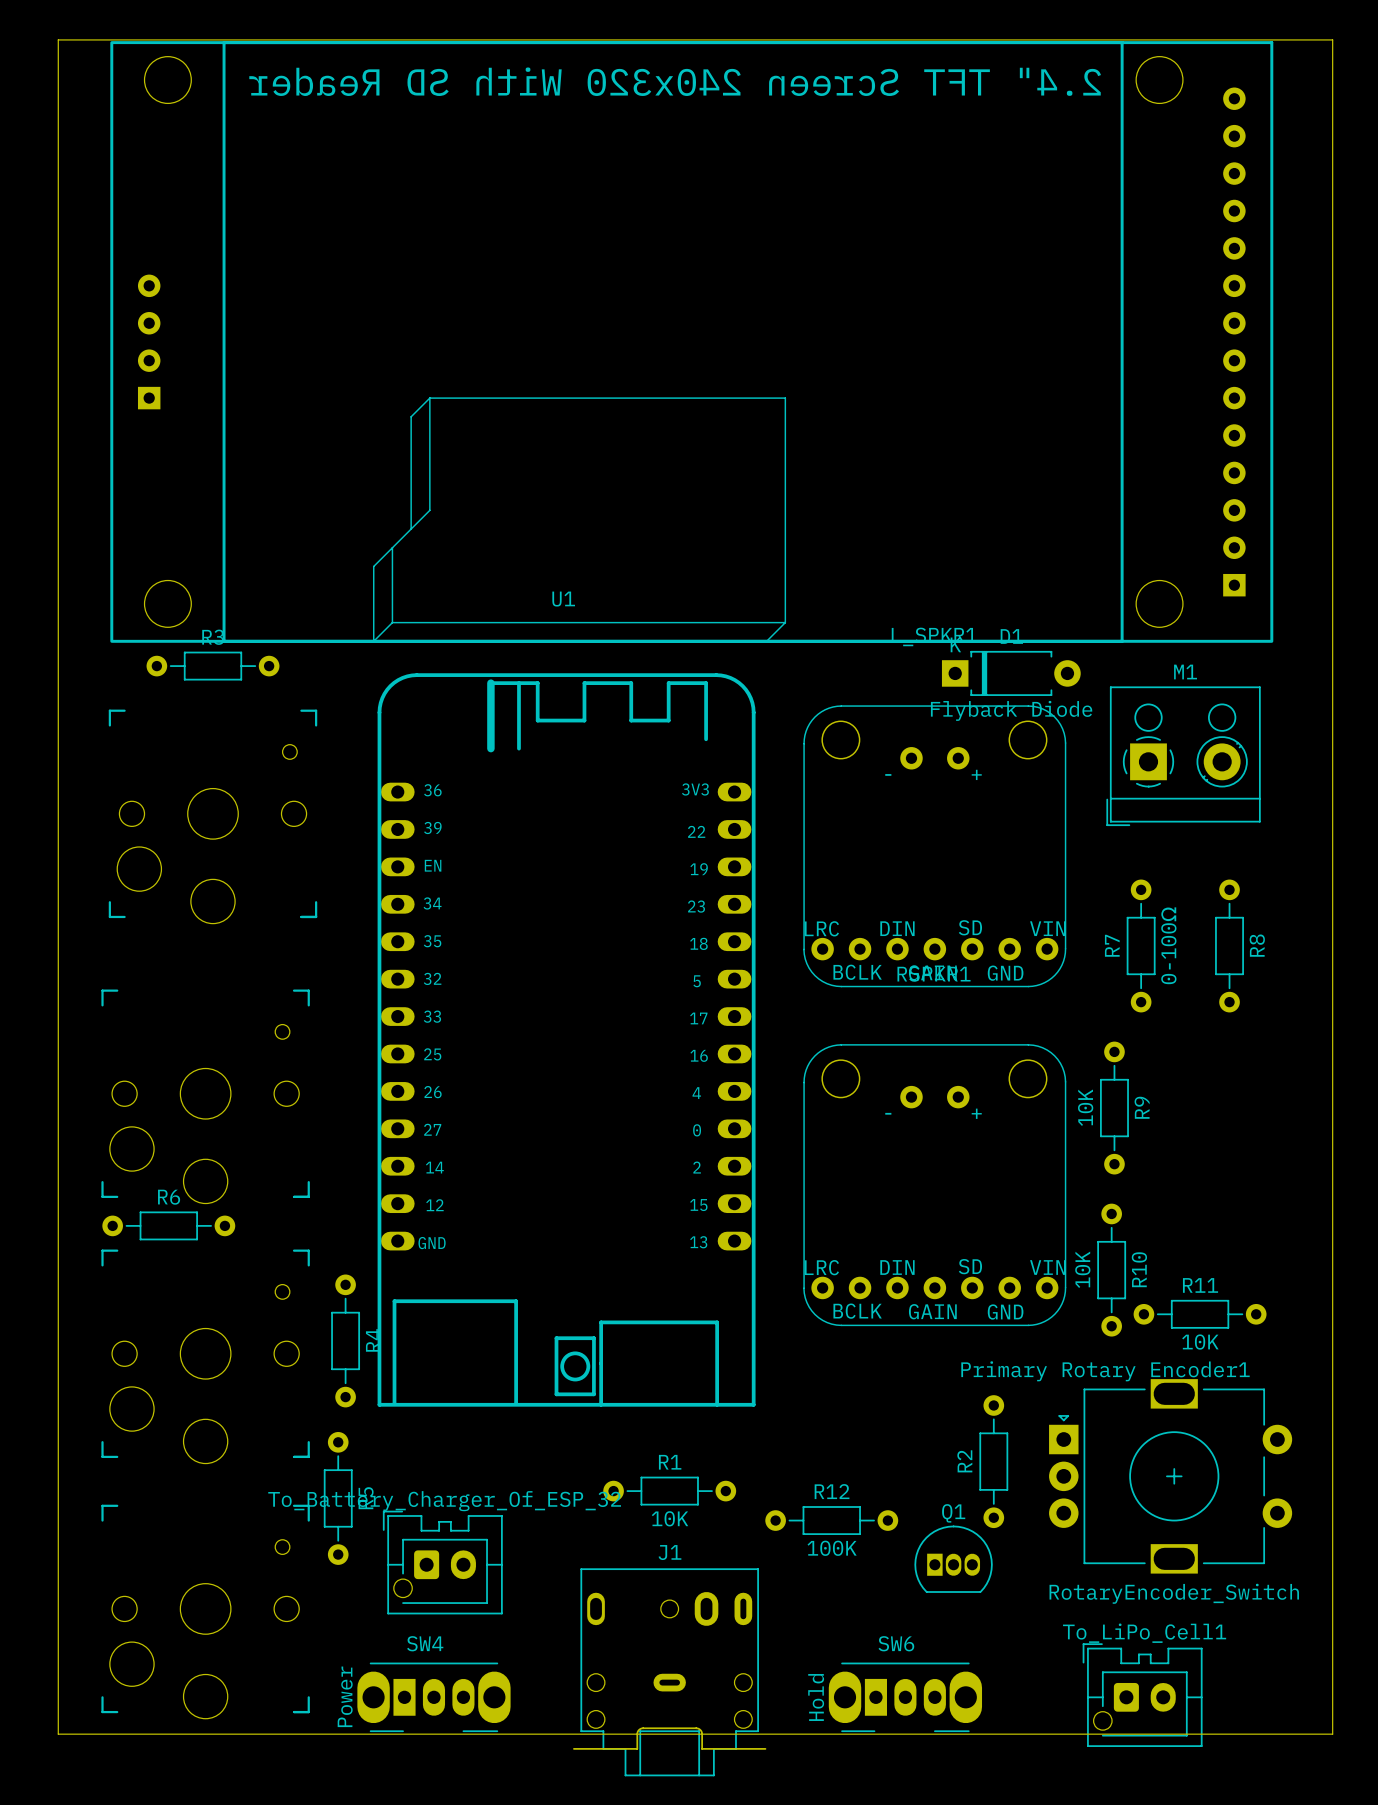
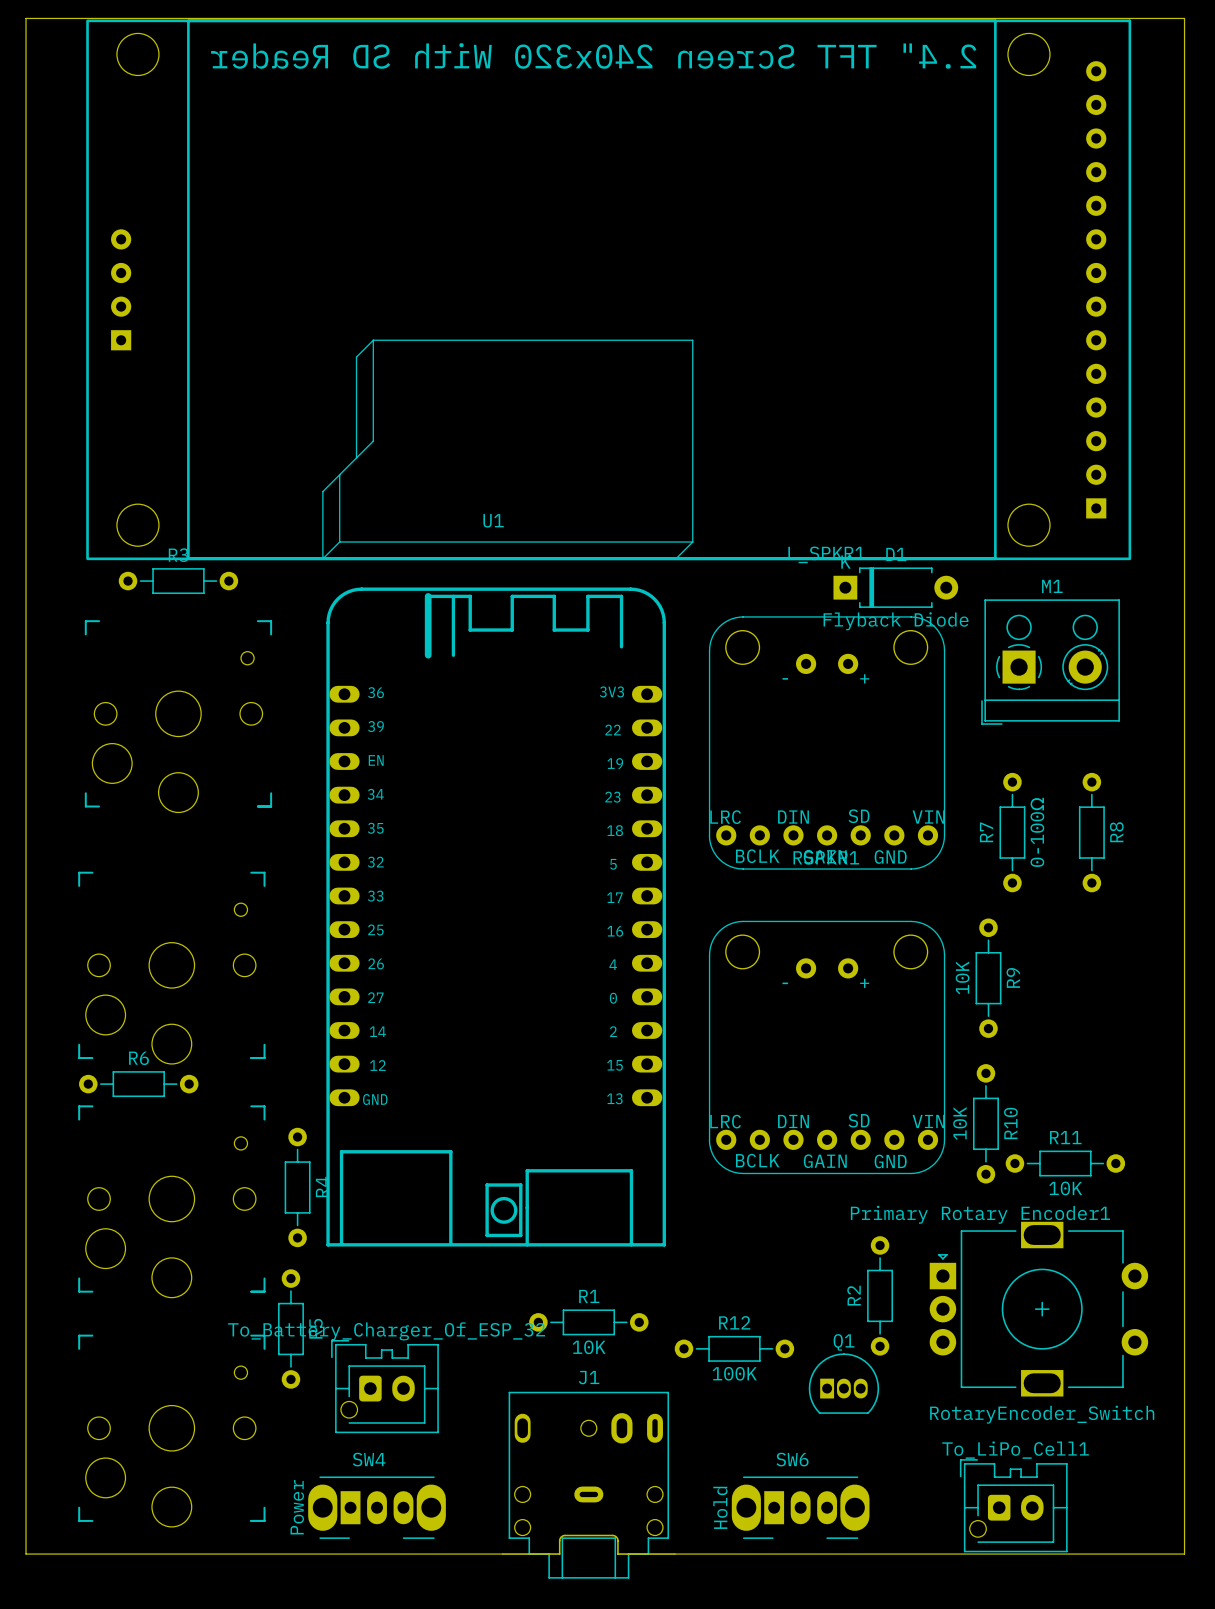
board edge: (58, 39) (58, 1734) (1332, 1734) -> (39, 18) (26, 18) (26, 1554) (502, 1554)
board edge: none -> (1184, 1540) (1184, 1554) (674, 1554)

